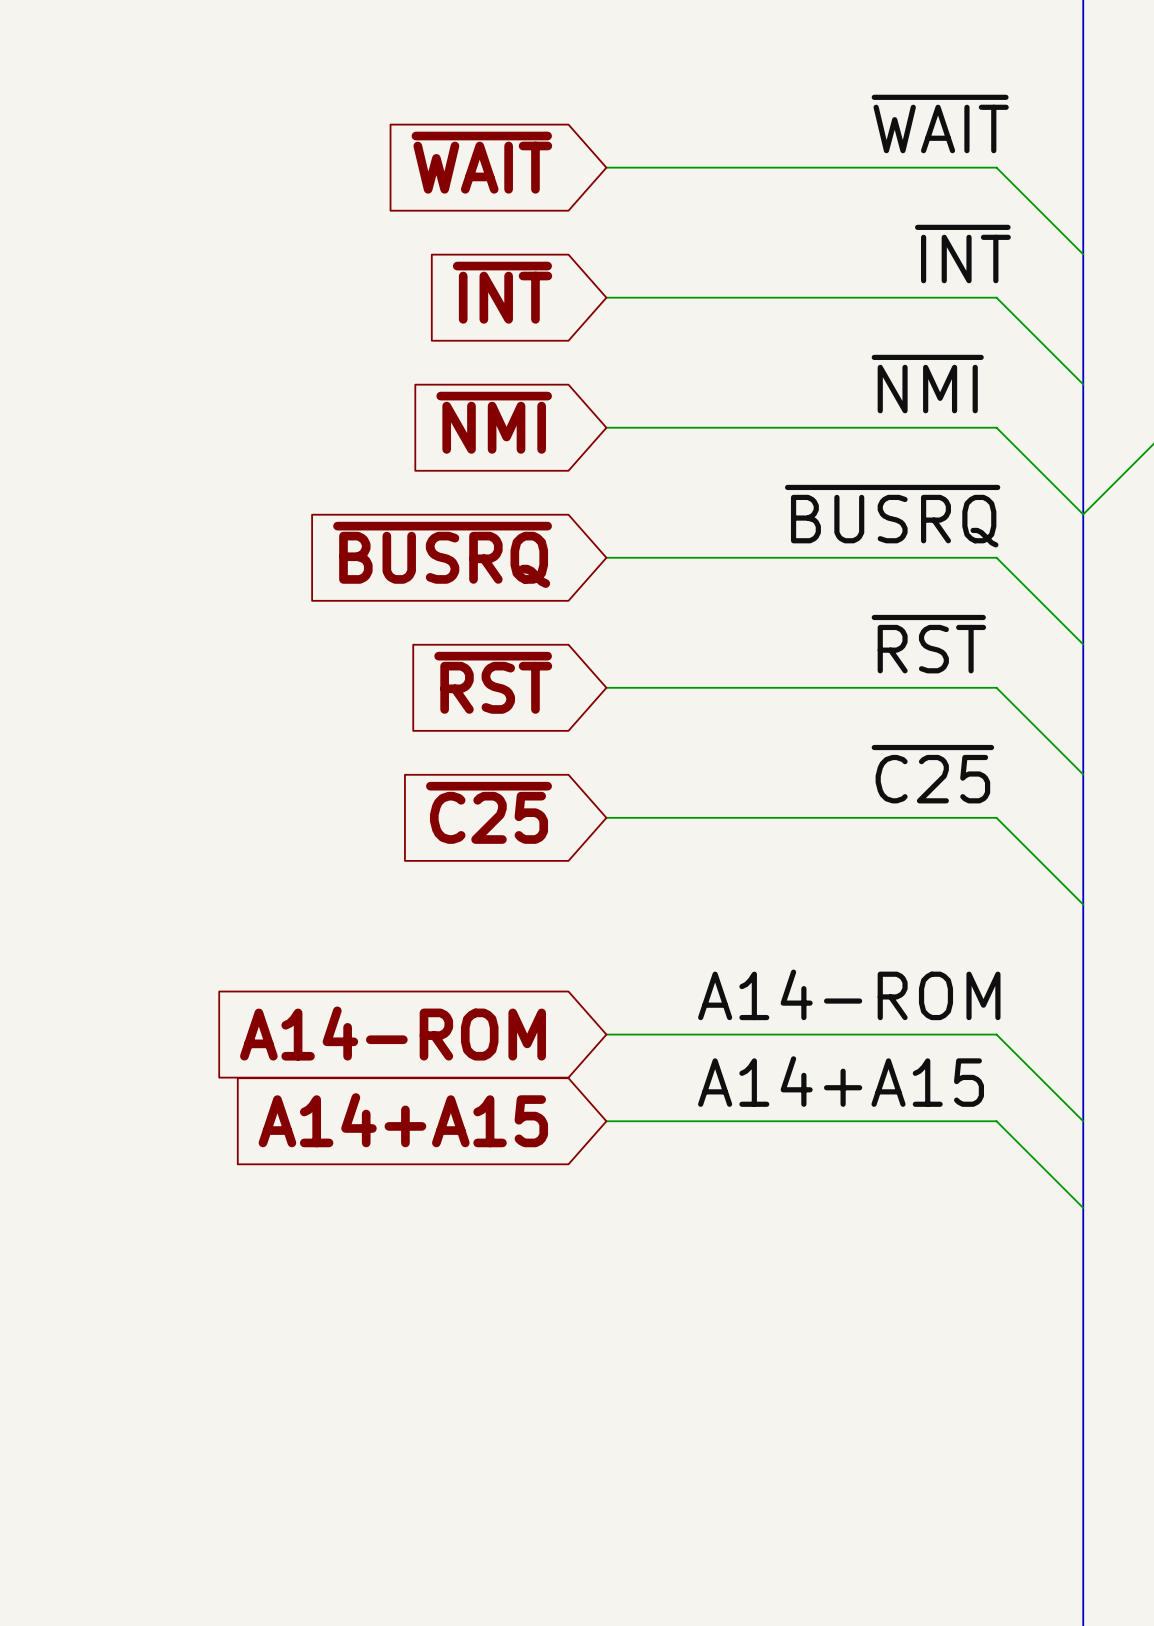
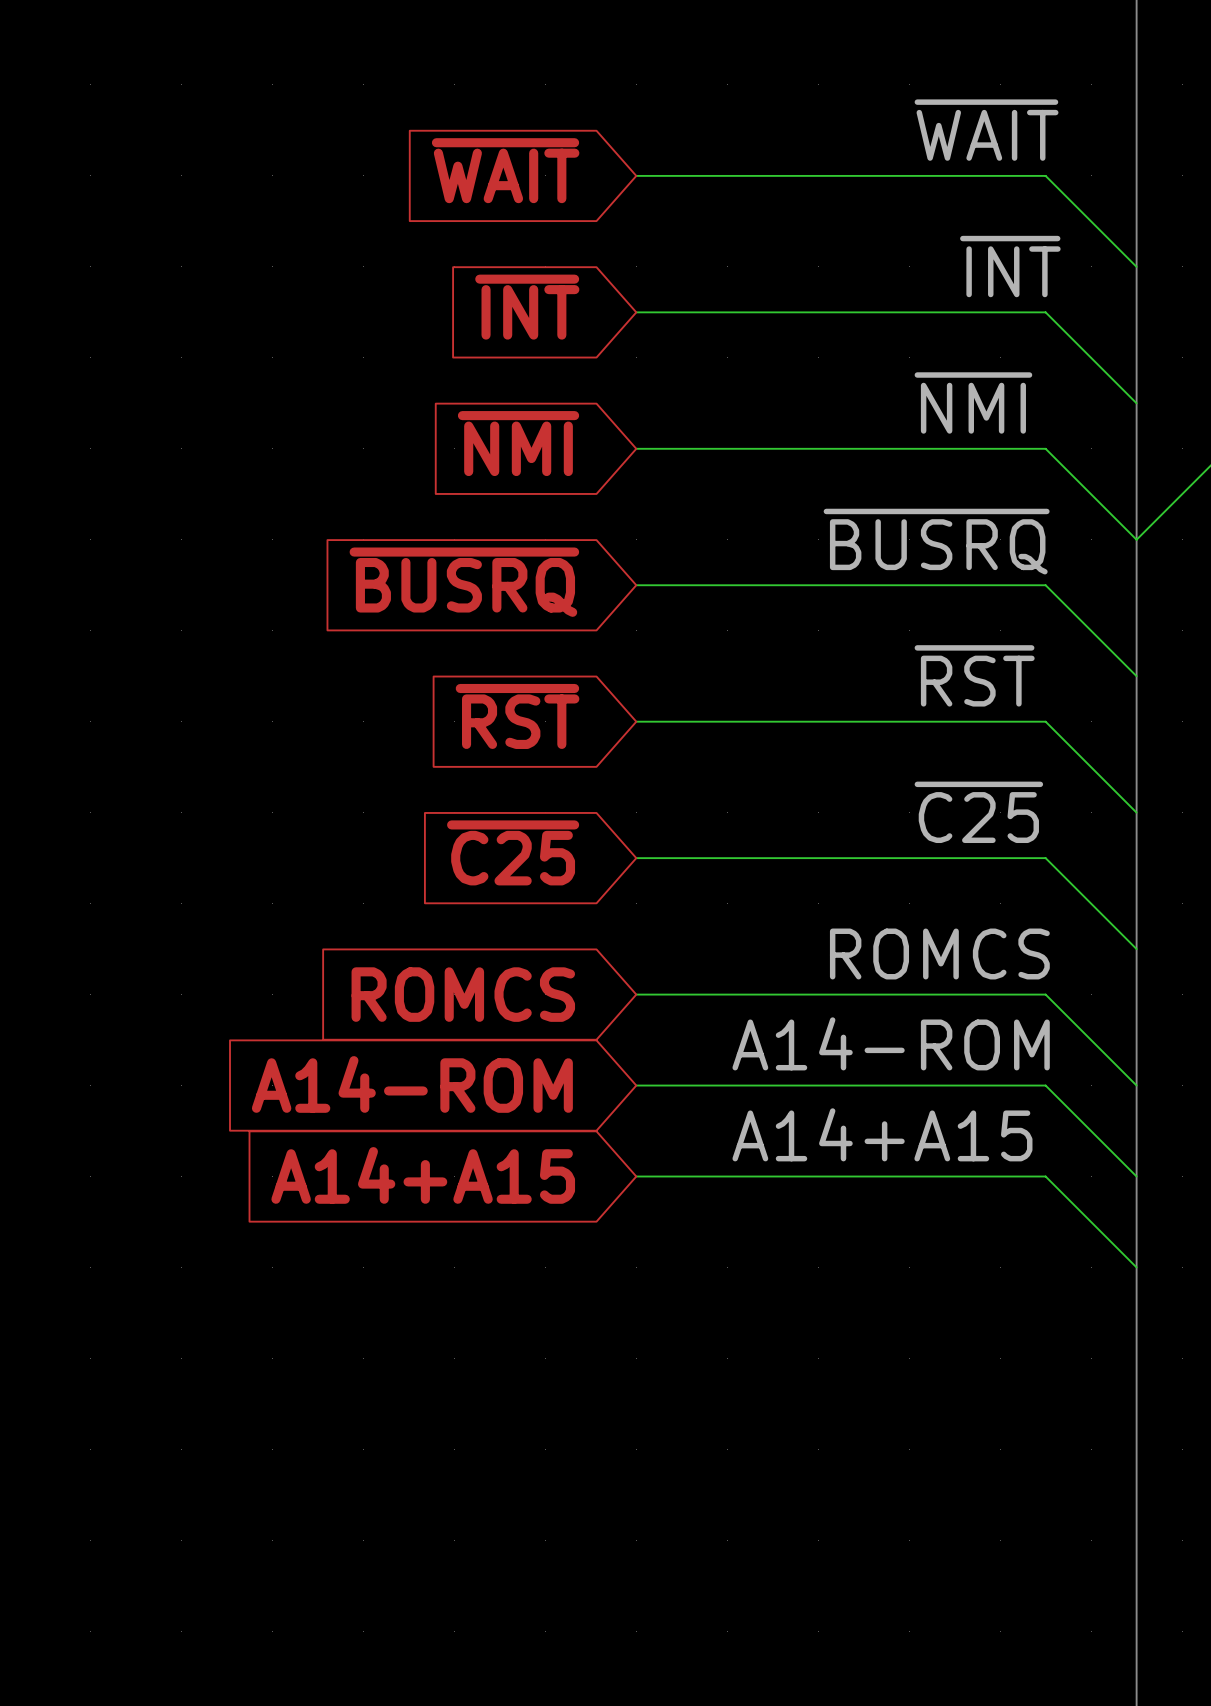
label: none -> ROMCS (939, 953)
global label: none -> ROMCS (463, 994)
wire: none -> (636, 994) (1045, 994) (1136, 1085)

